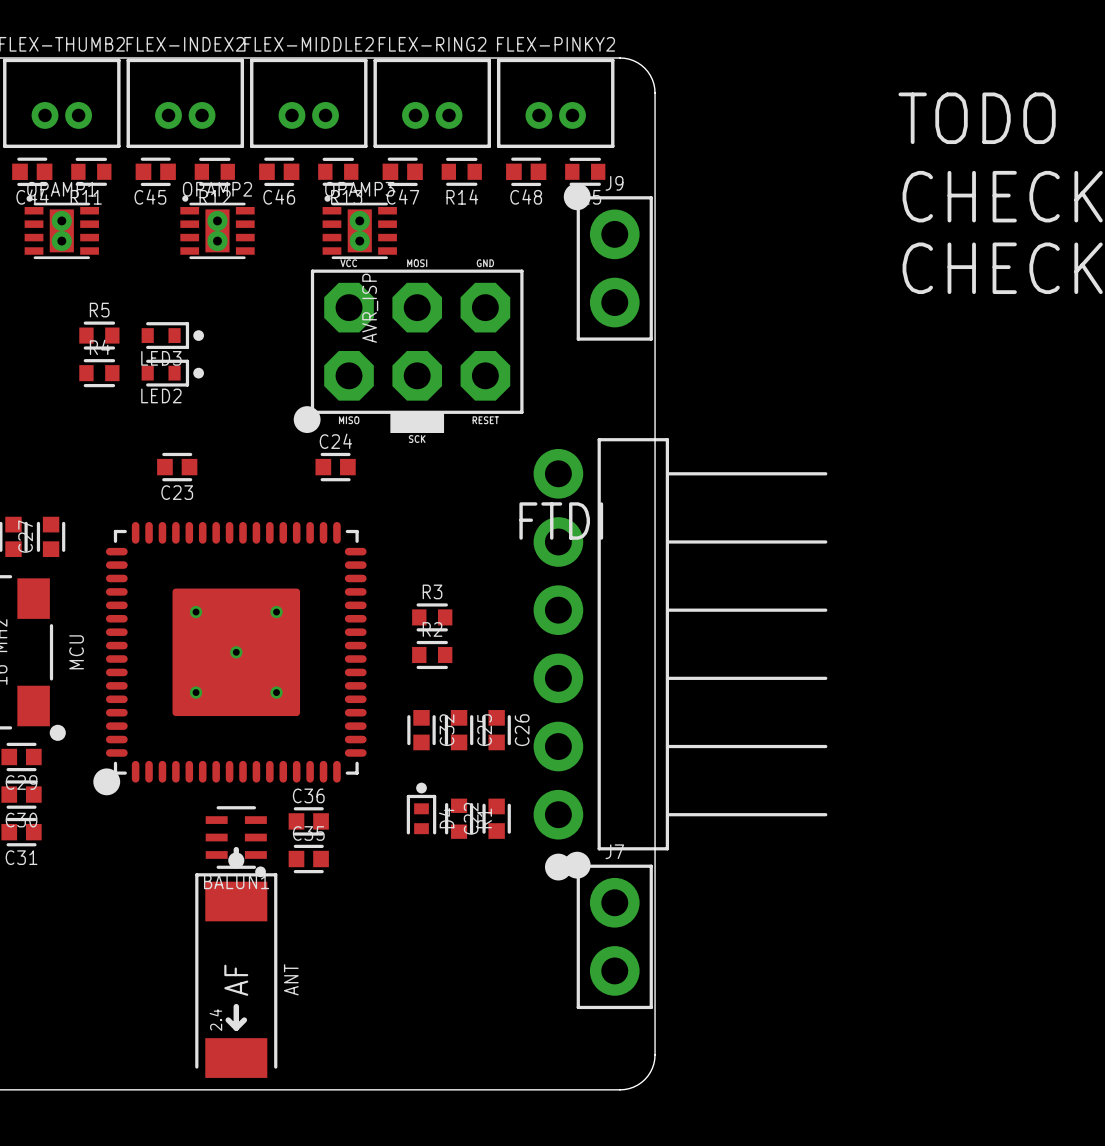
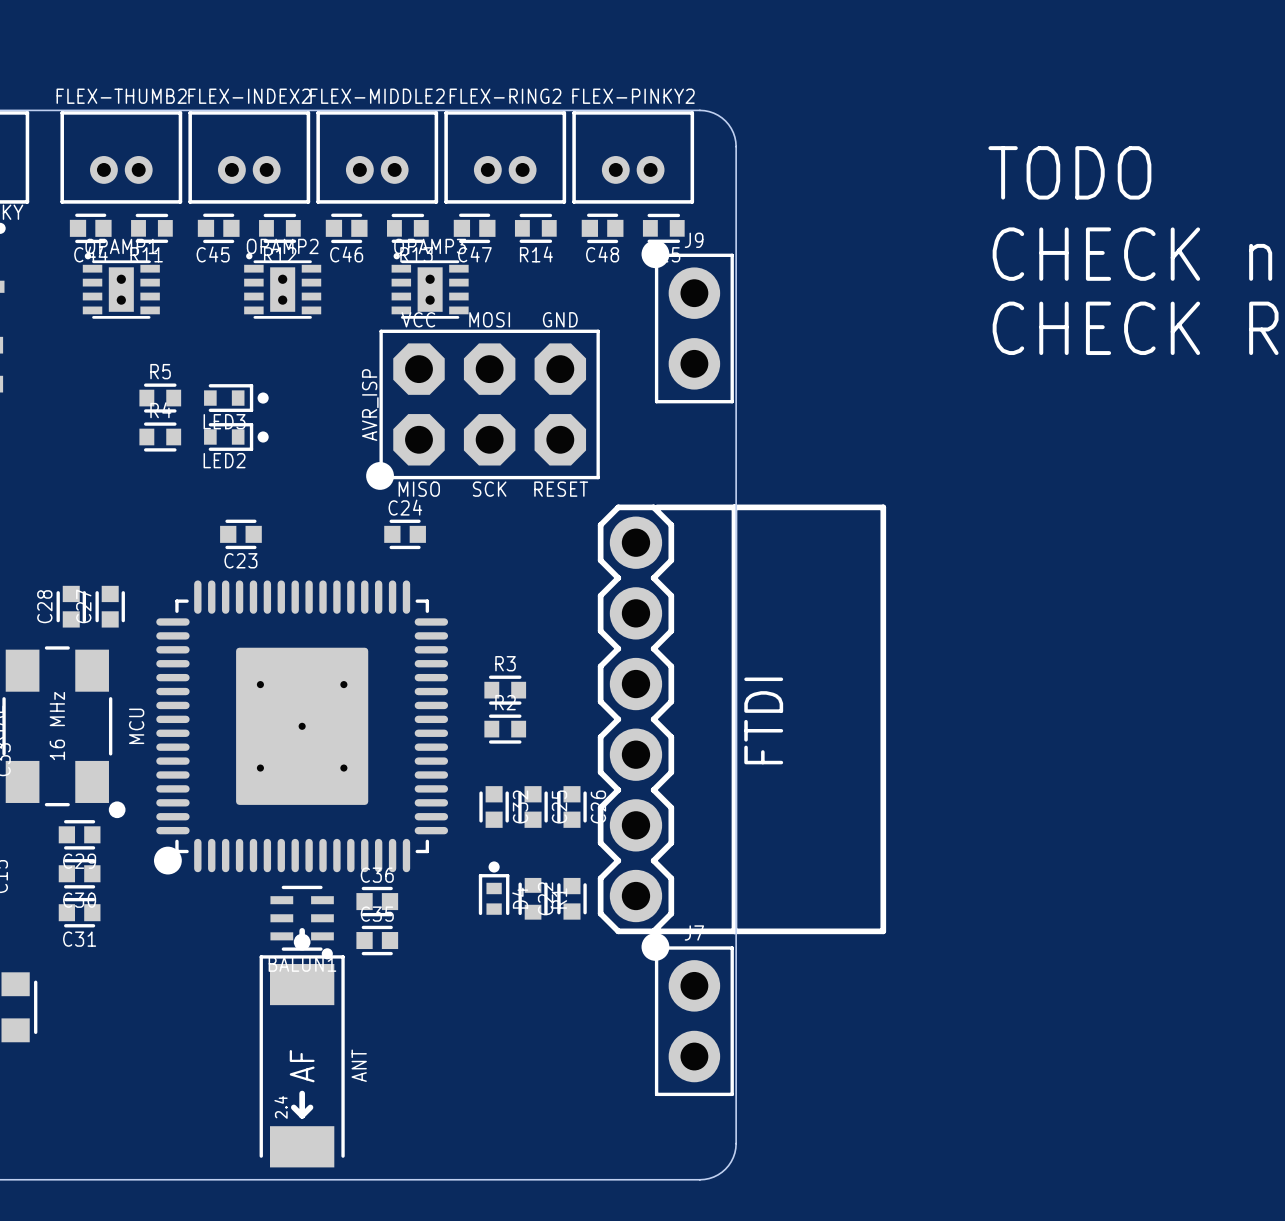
AVR_ISP footprint: [293, 269, 524, 434] -> [366, 329, 600, 490]
AVR_ISP name position: AVR_ISP (370, 308) -> AVR_ISP (370, 405)
FTDI footprint: [533, 438, 828, 881] -> [597, 504, 887, 935]
MCU footprint: [93, 521, 367, 796] -> [153, 580, 449, 875]
FTDI name position: FTDI (561, 521) -> FTDI (763, 720)

